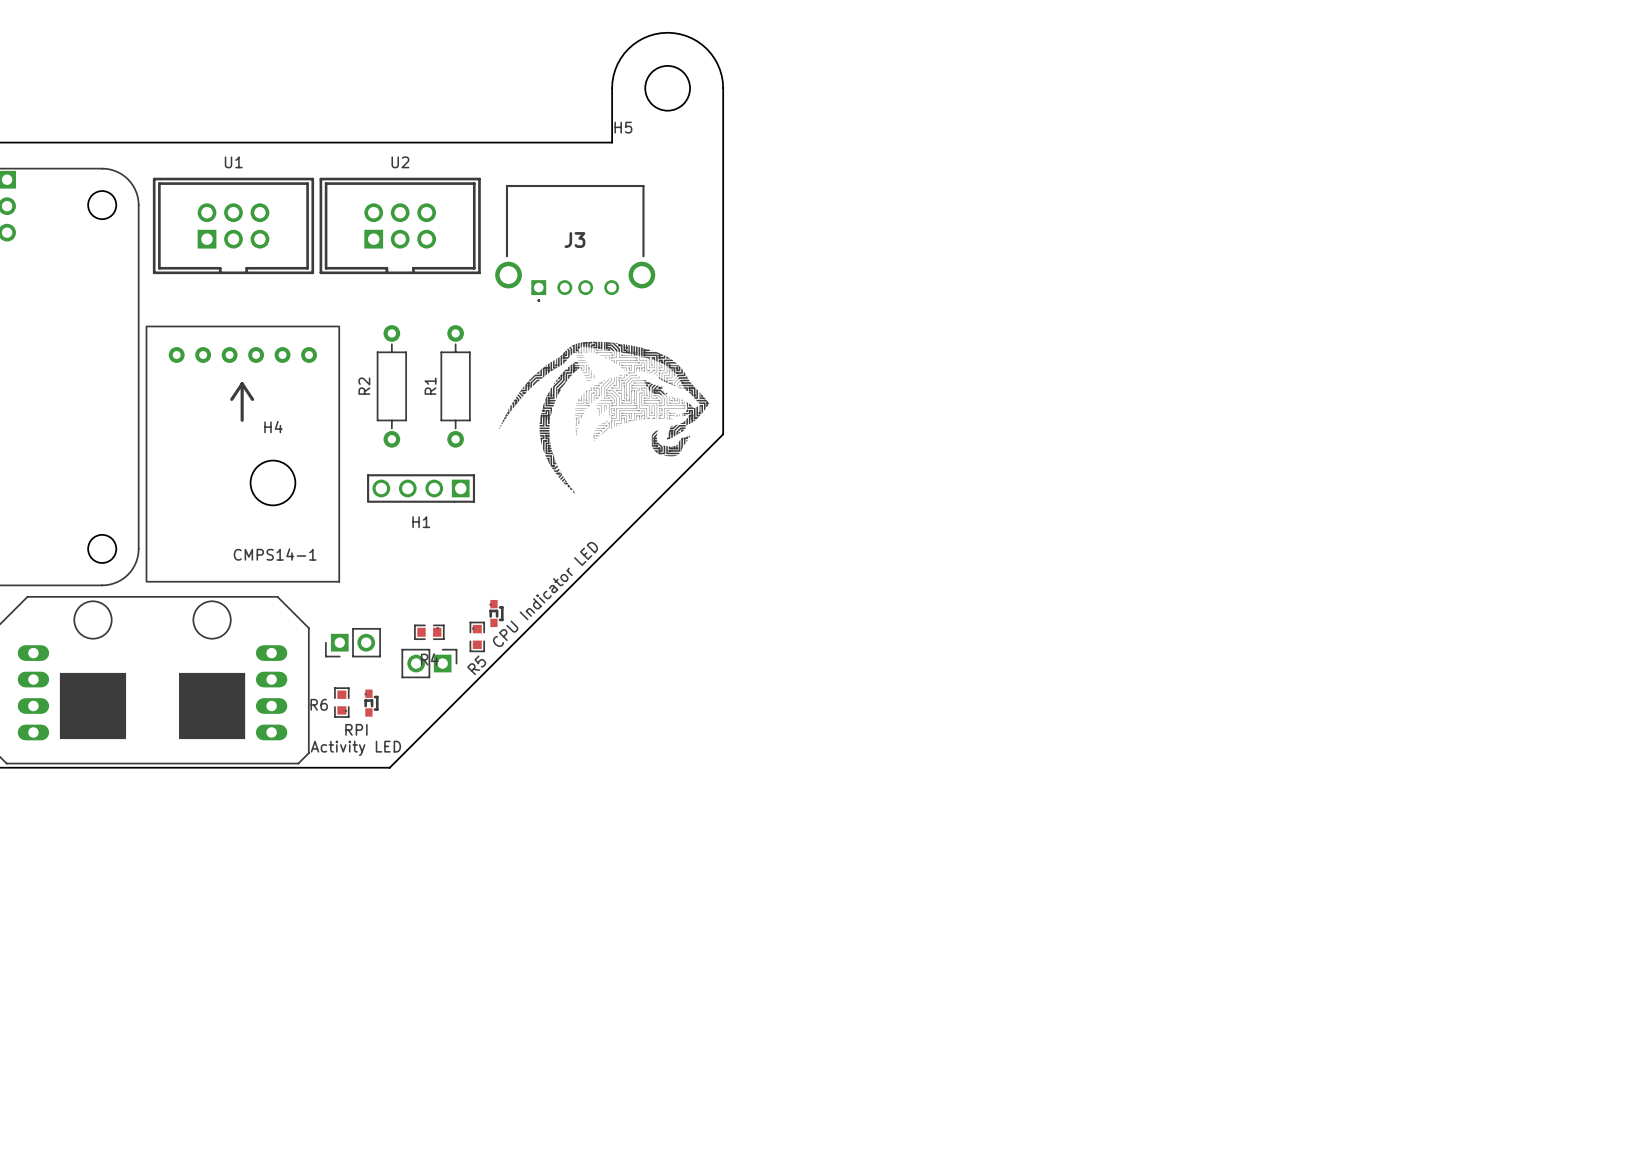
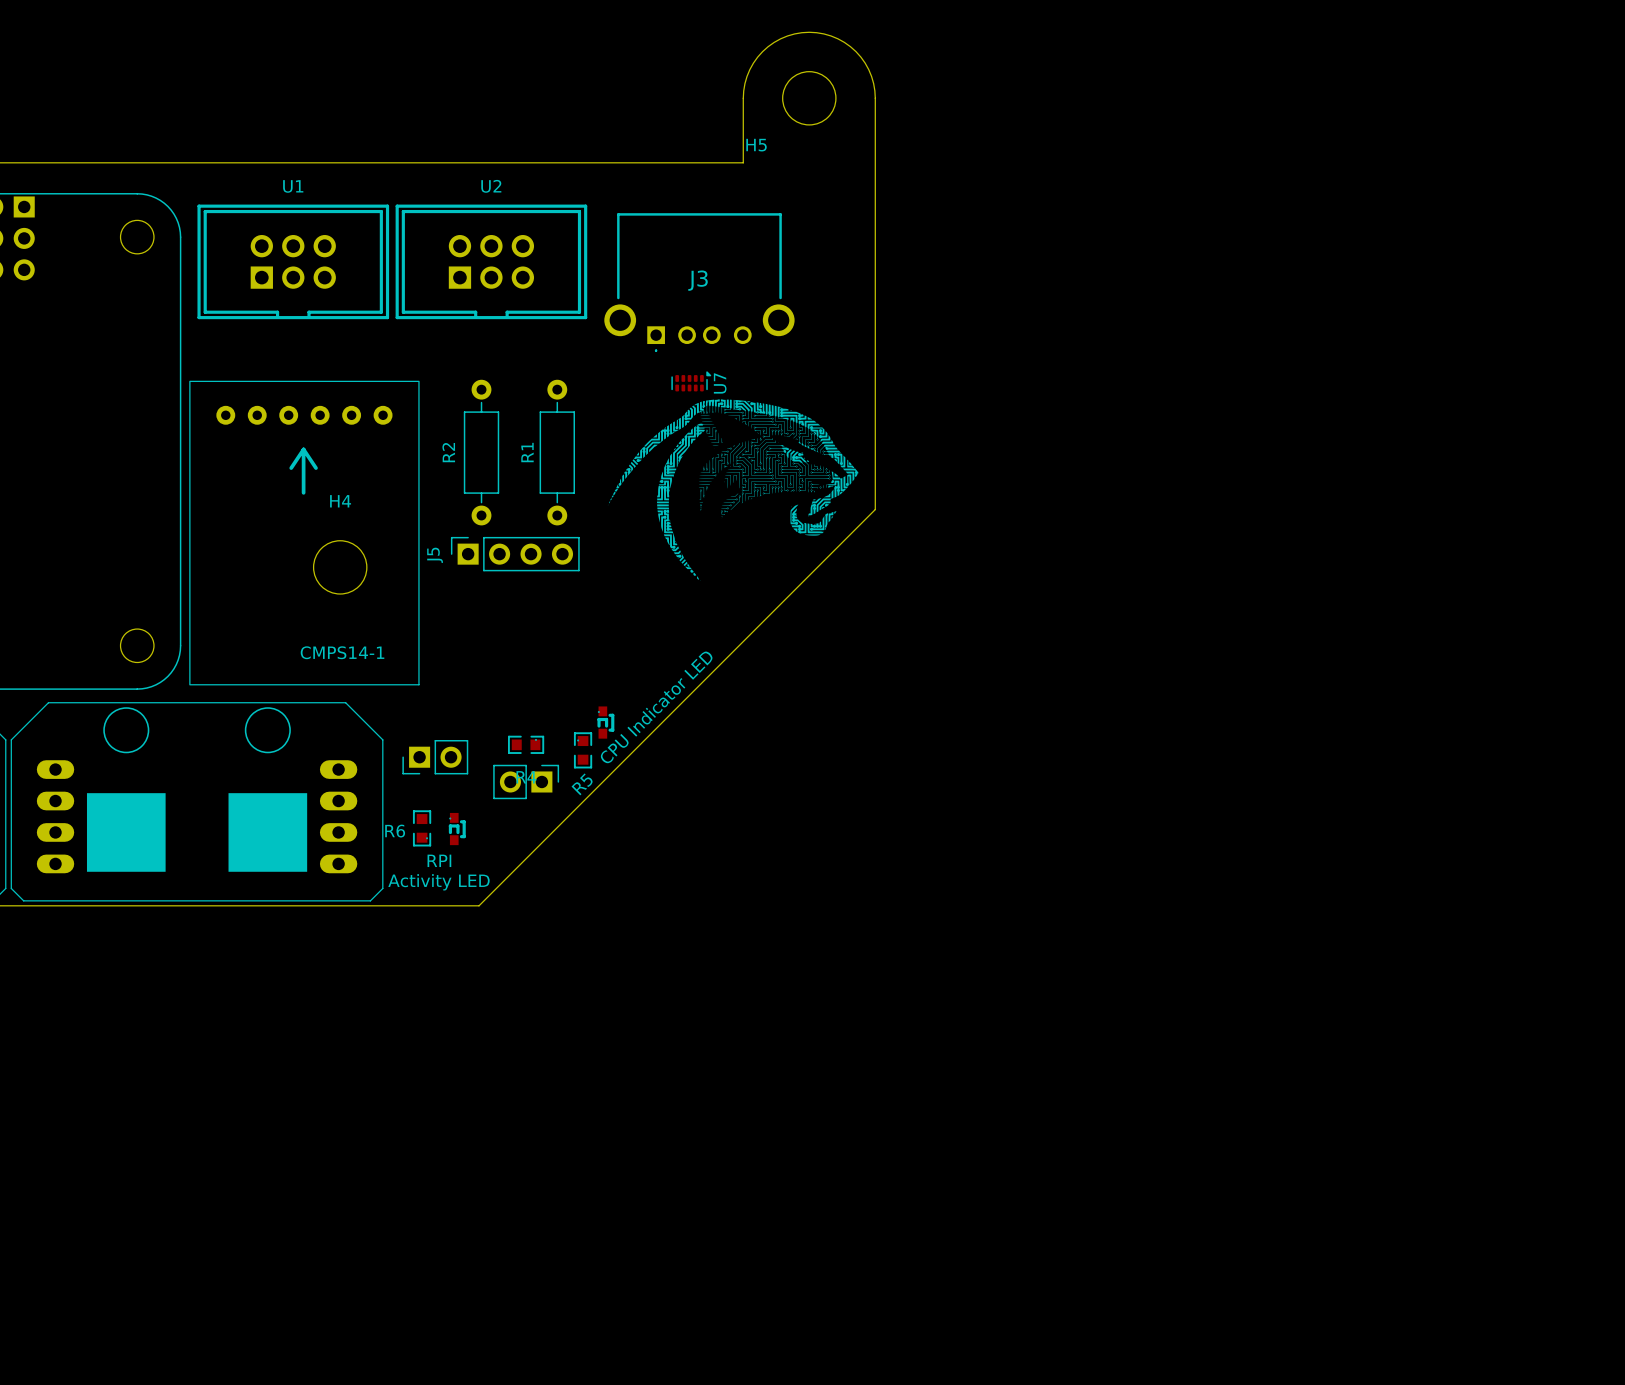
U7: none -> (691, 381)
J5: none -> (515, 554)
H1: (421, 488) -> none

